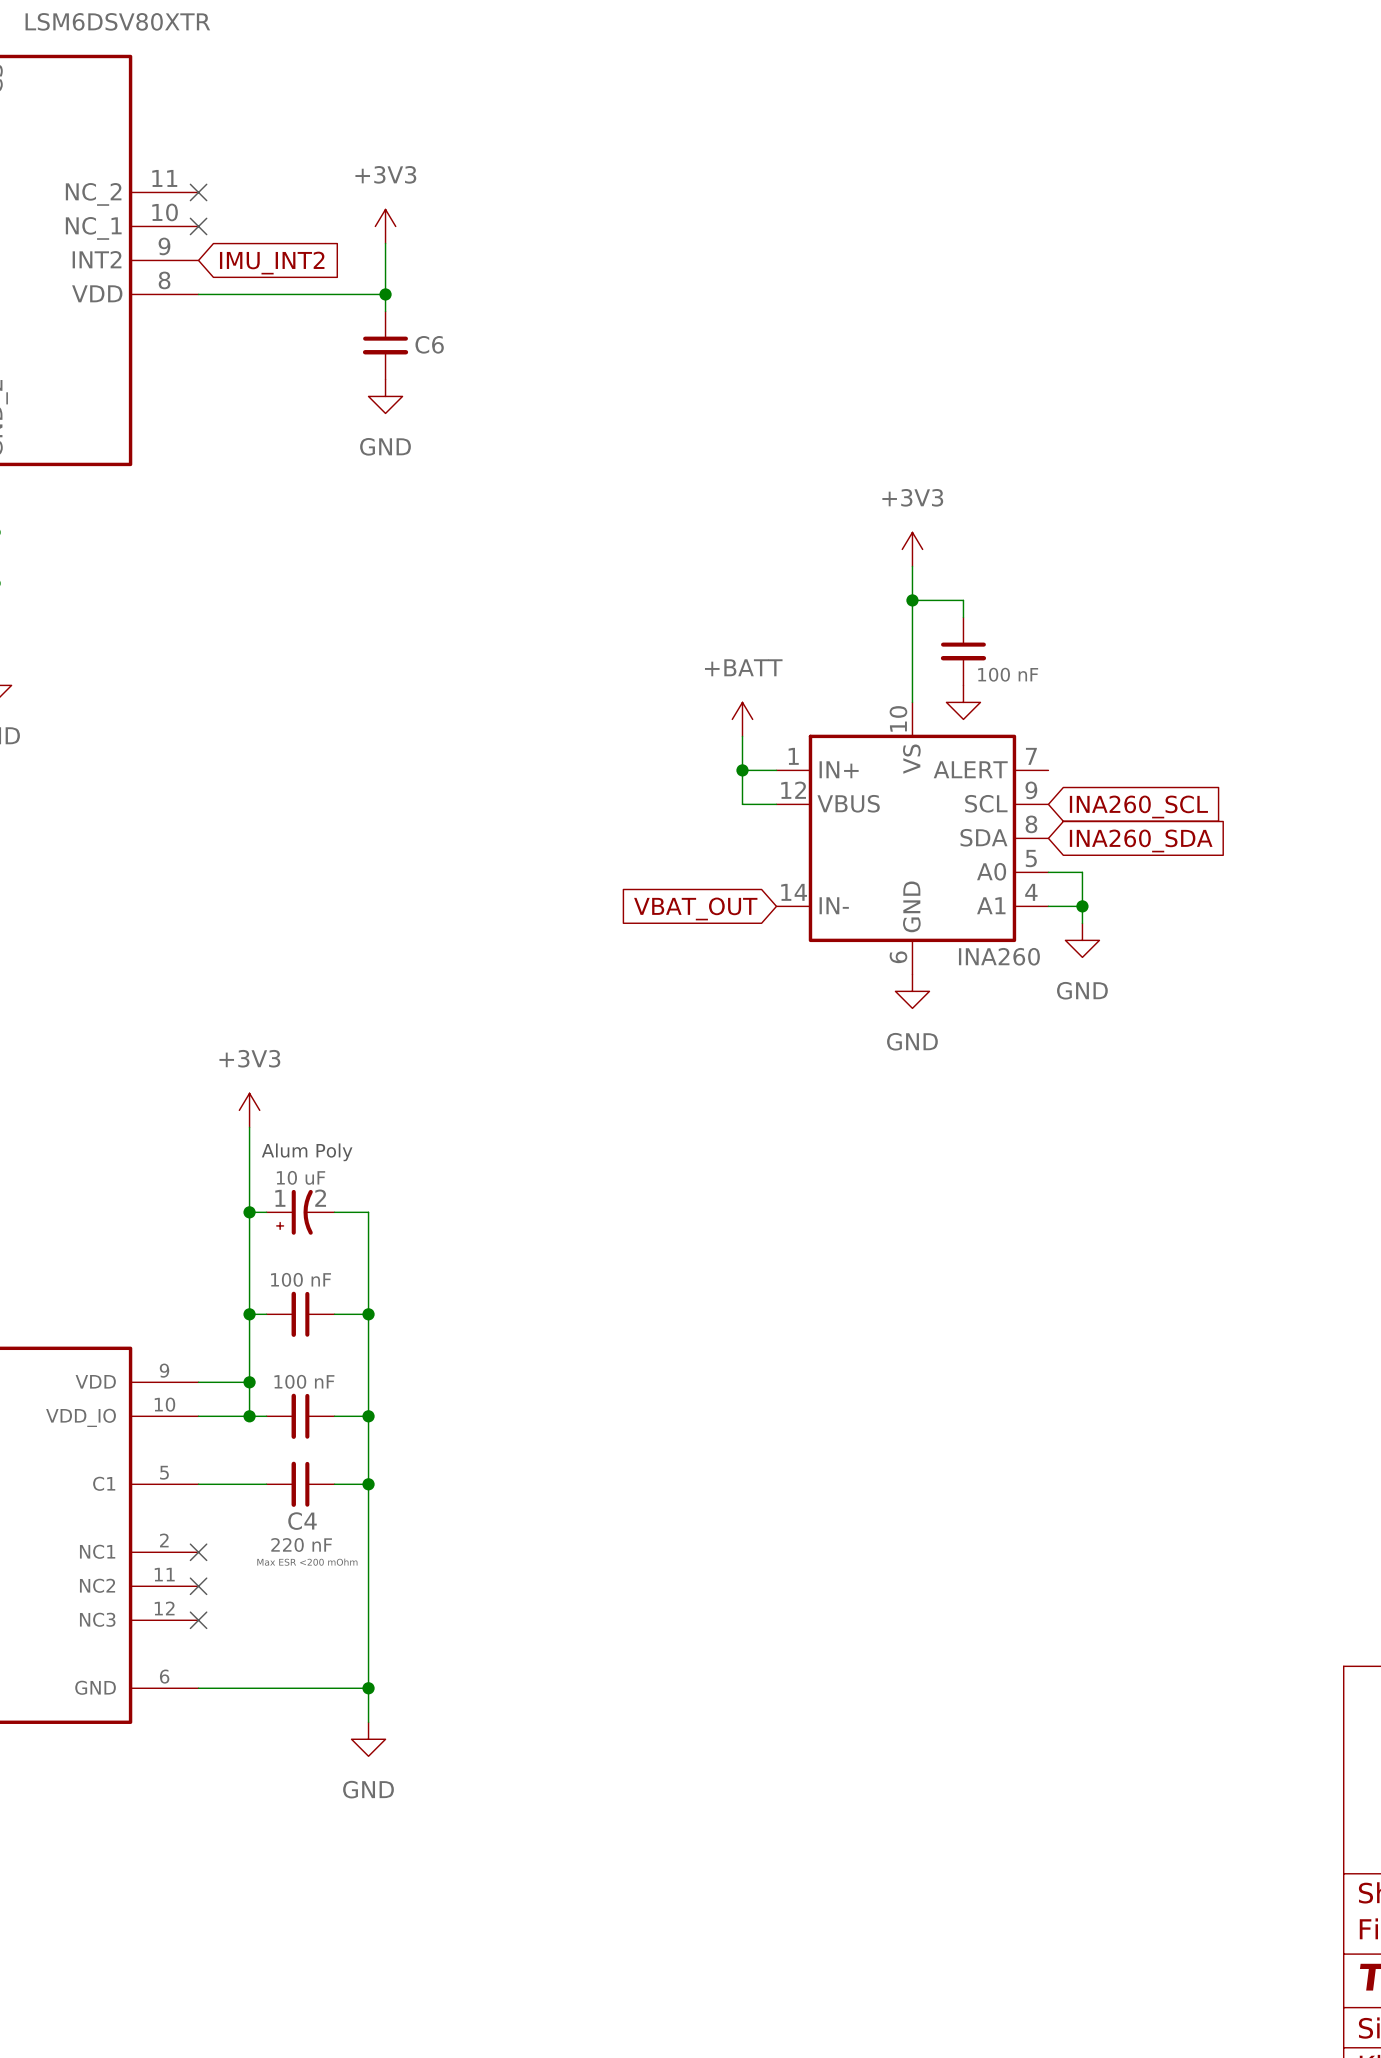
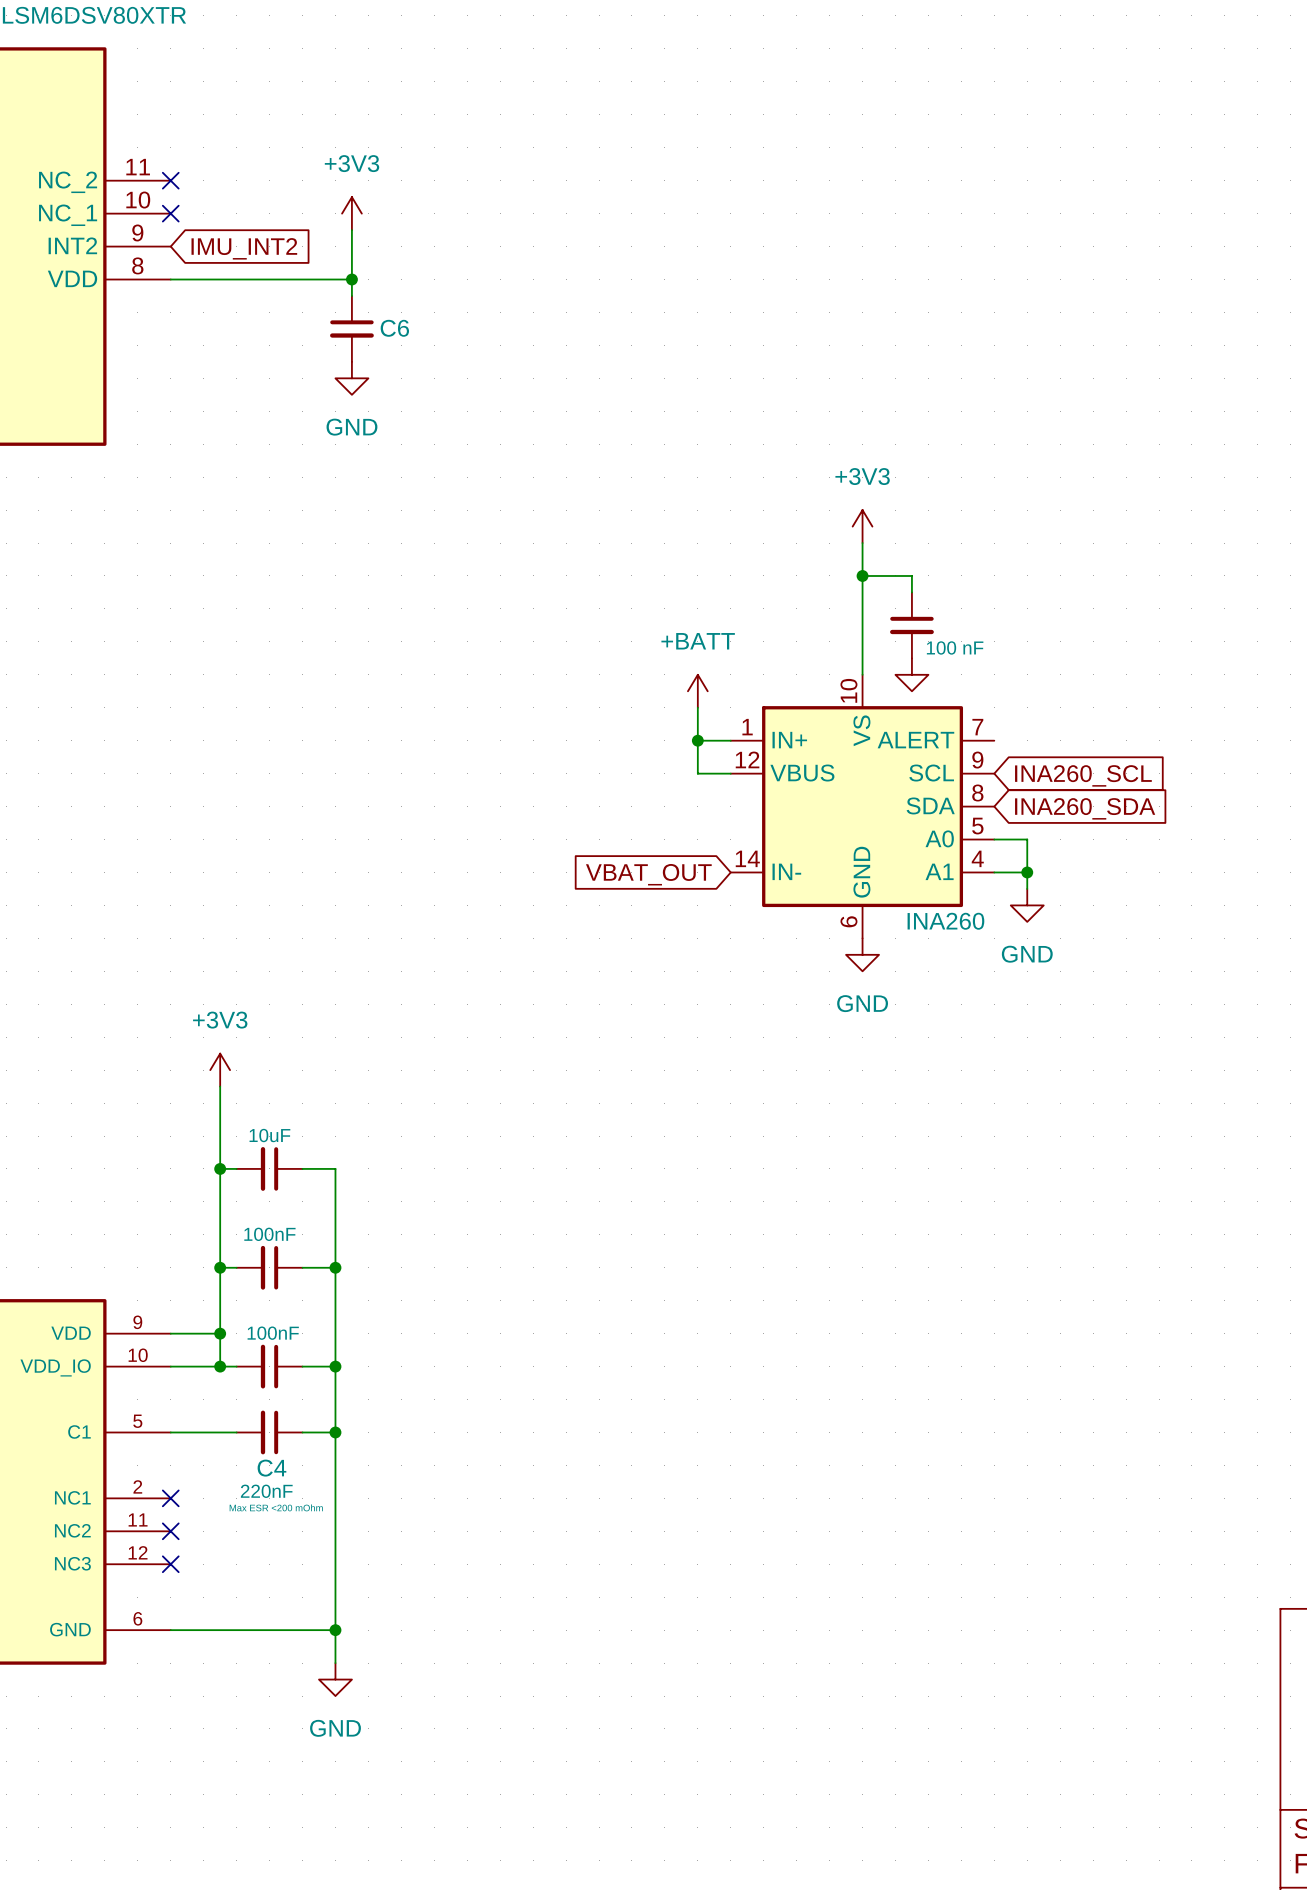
text: Alum Poly (307, 1152) -> none
part value: 10 uF (301, 1177) -> 10uF (269, 1135)
part symbol: [266, 1189, 335, 1235] -> [236, 1147, 303, 1191]
part value: 100 nF (301, 1279) -> 100nF (269, 1234)
part value: 100 nF (304, 1381) -> 100nF (273, 1333)
C4 value: 220 nF (301, 1545) -> 220nF (266, 1491)

